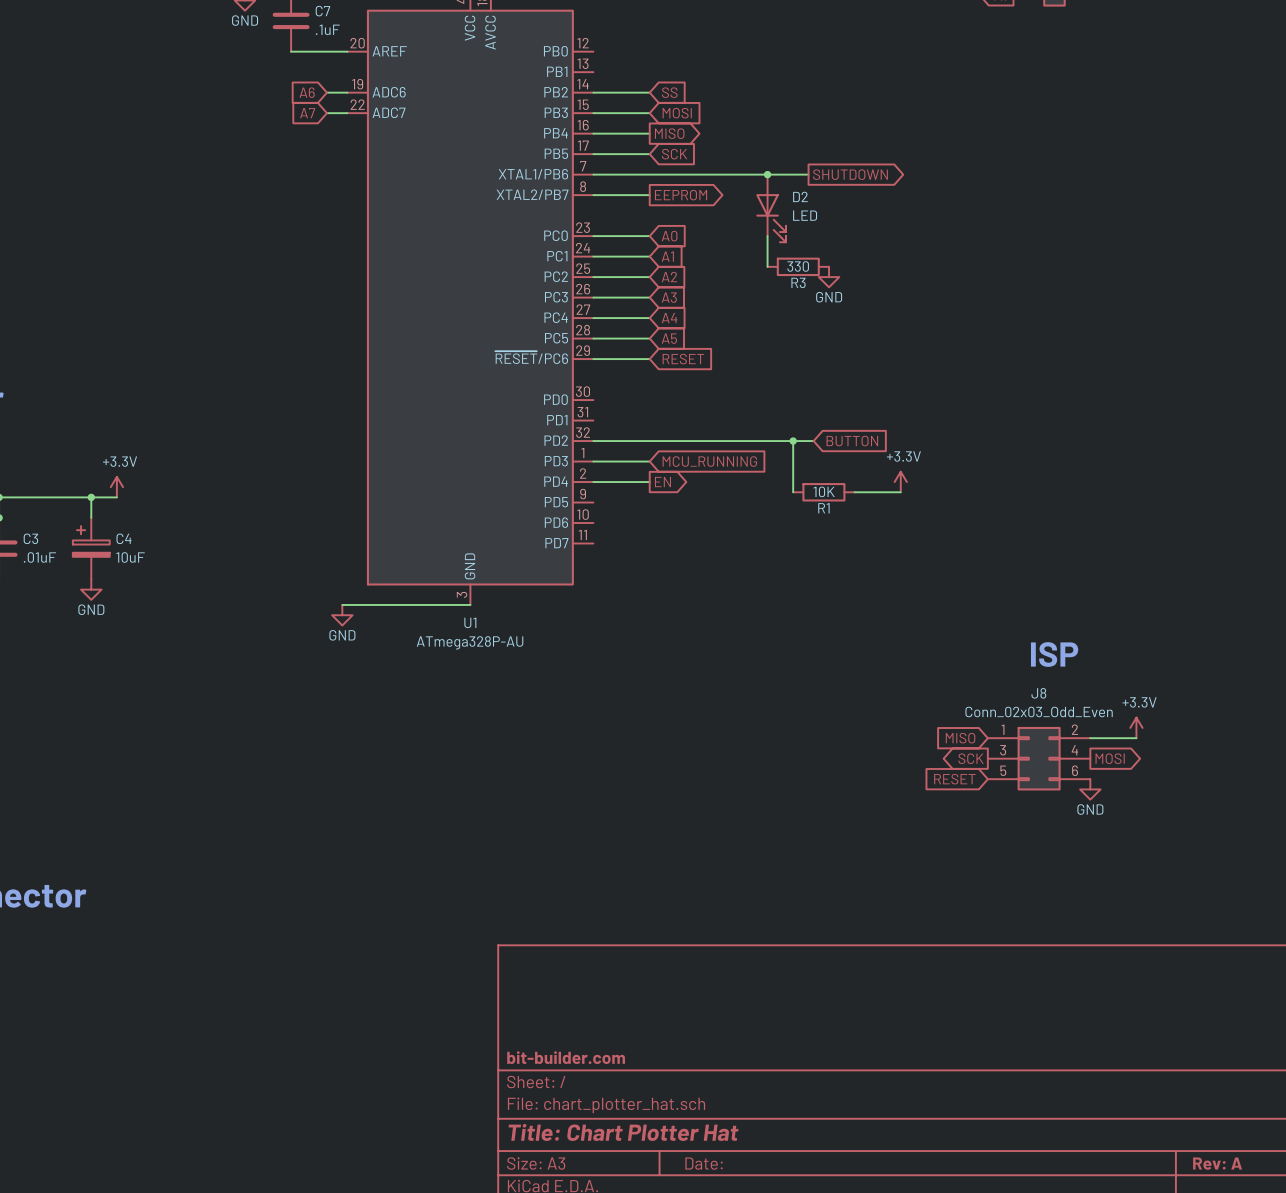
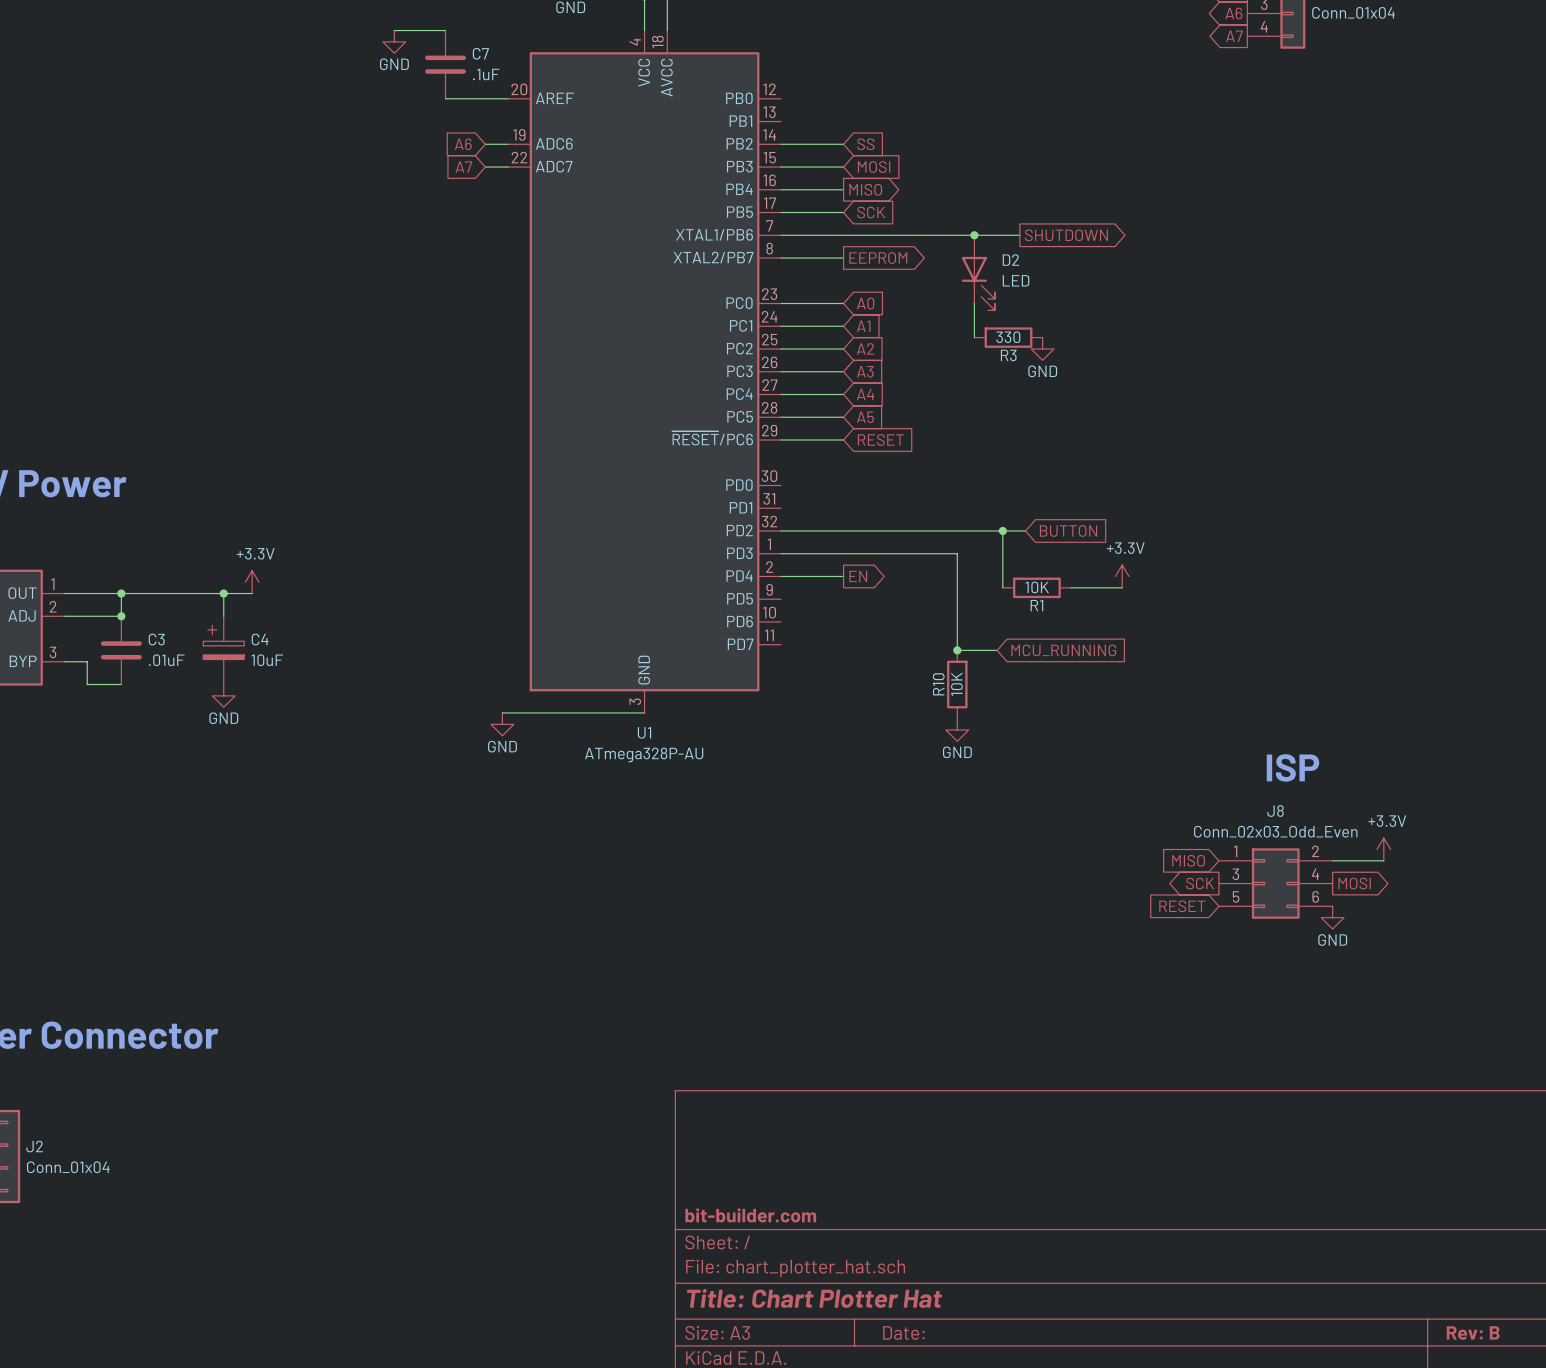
wire: none -> (843, 553) (957, 553) (957, 650) (997, 650)
global label position: MCU_RUNNING (709, 461) -> MCU_RUNNING (1063, 650)
junction: none -> (957, 650)
R10: none -> 10K (957, 684)
power symbol: none -> GND (957, 730)
title block: Rev: A (1217, 1163) -> Rev: B (1473, 1332)

